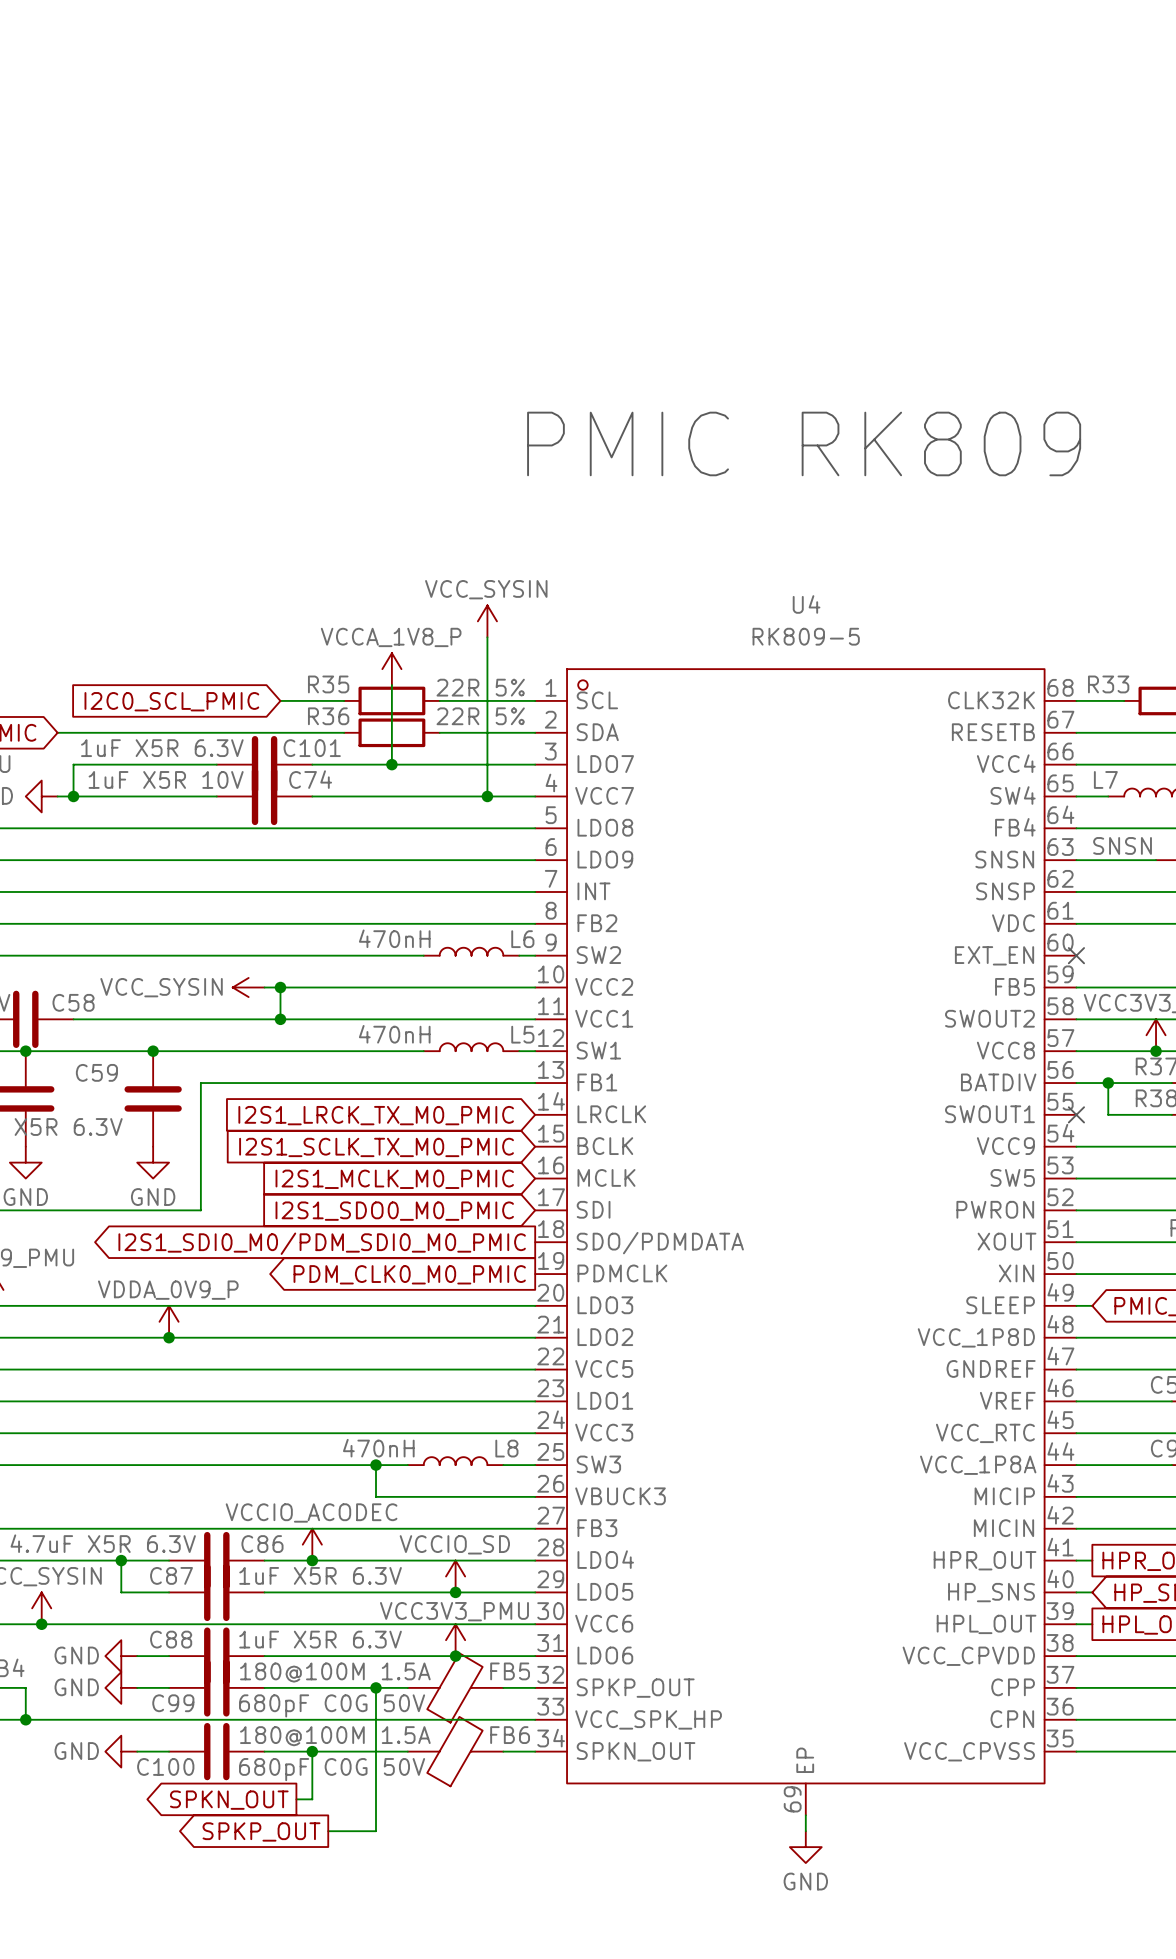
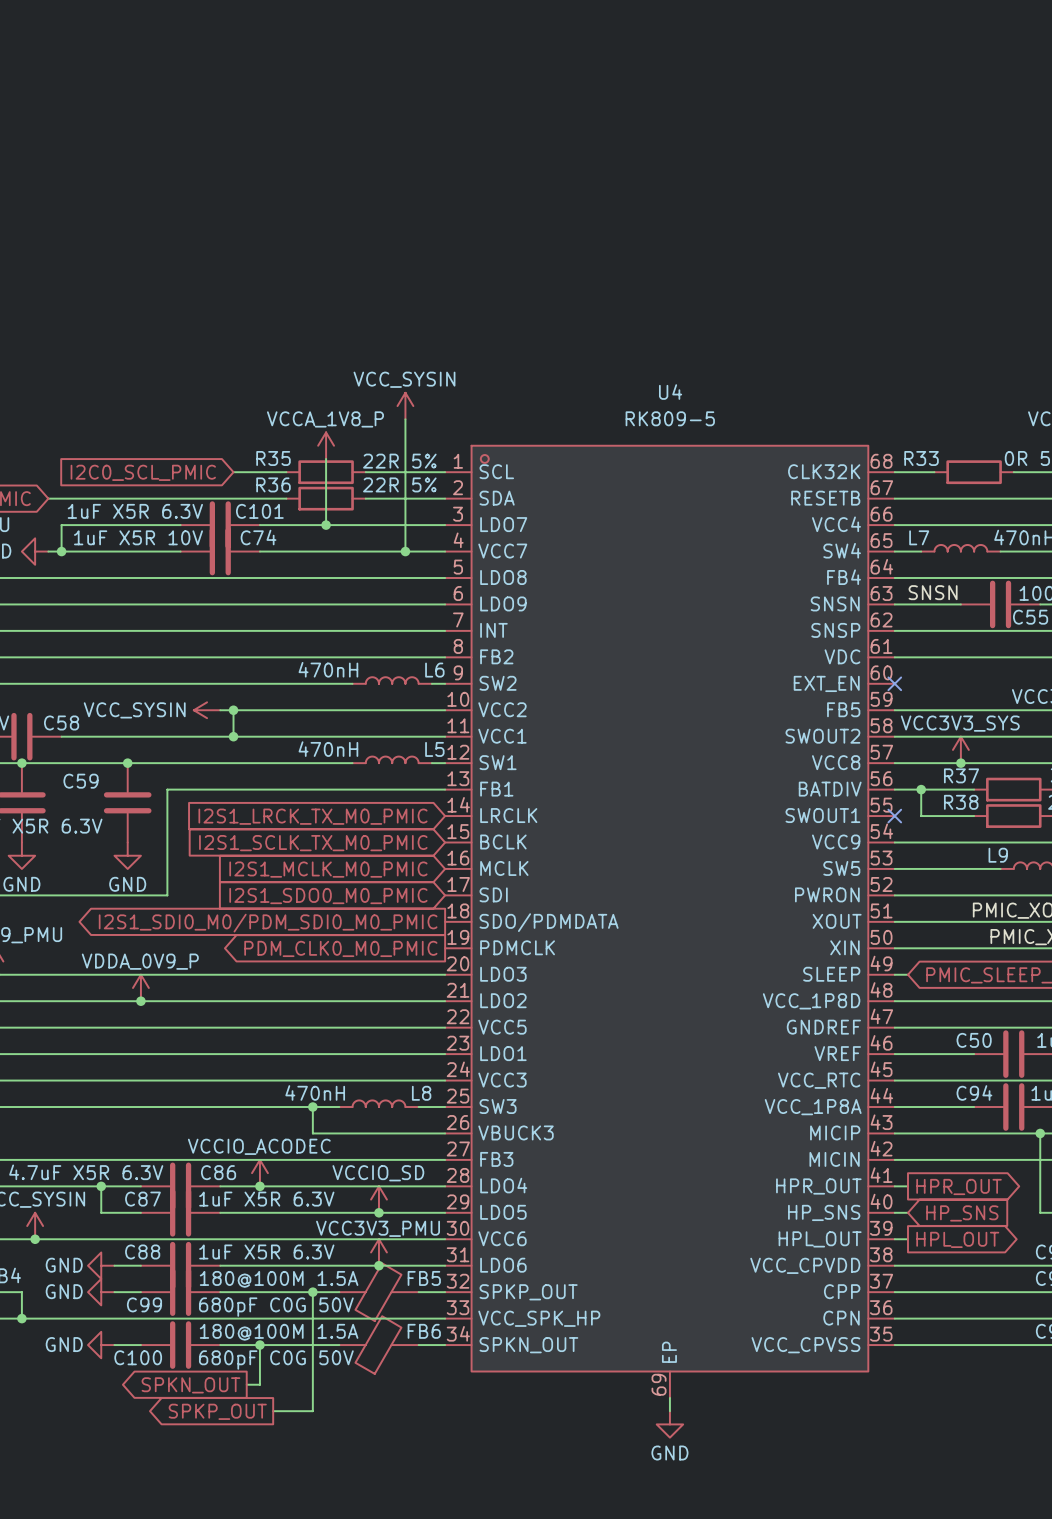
text: PMIC RK809 (804, 443) -> none

